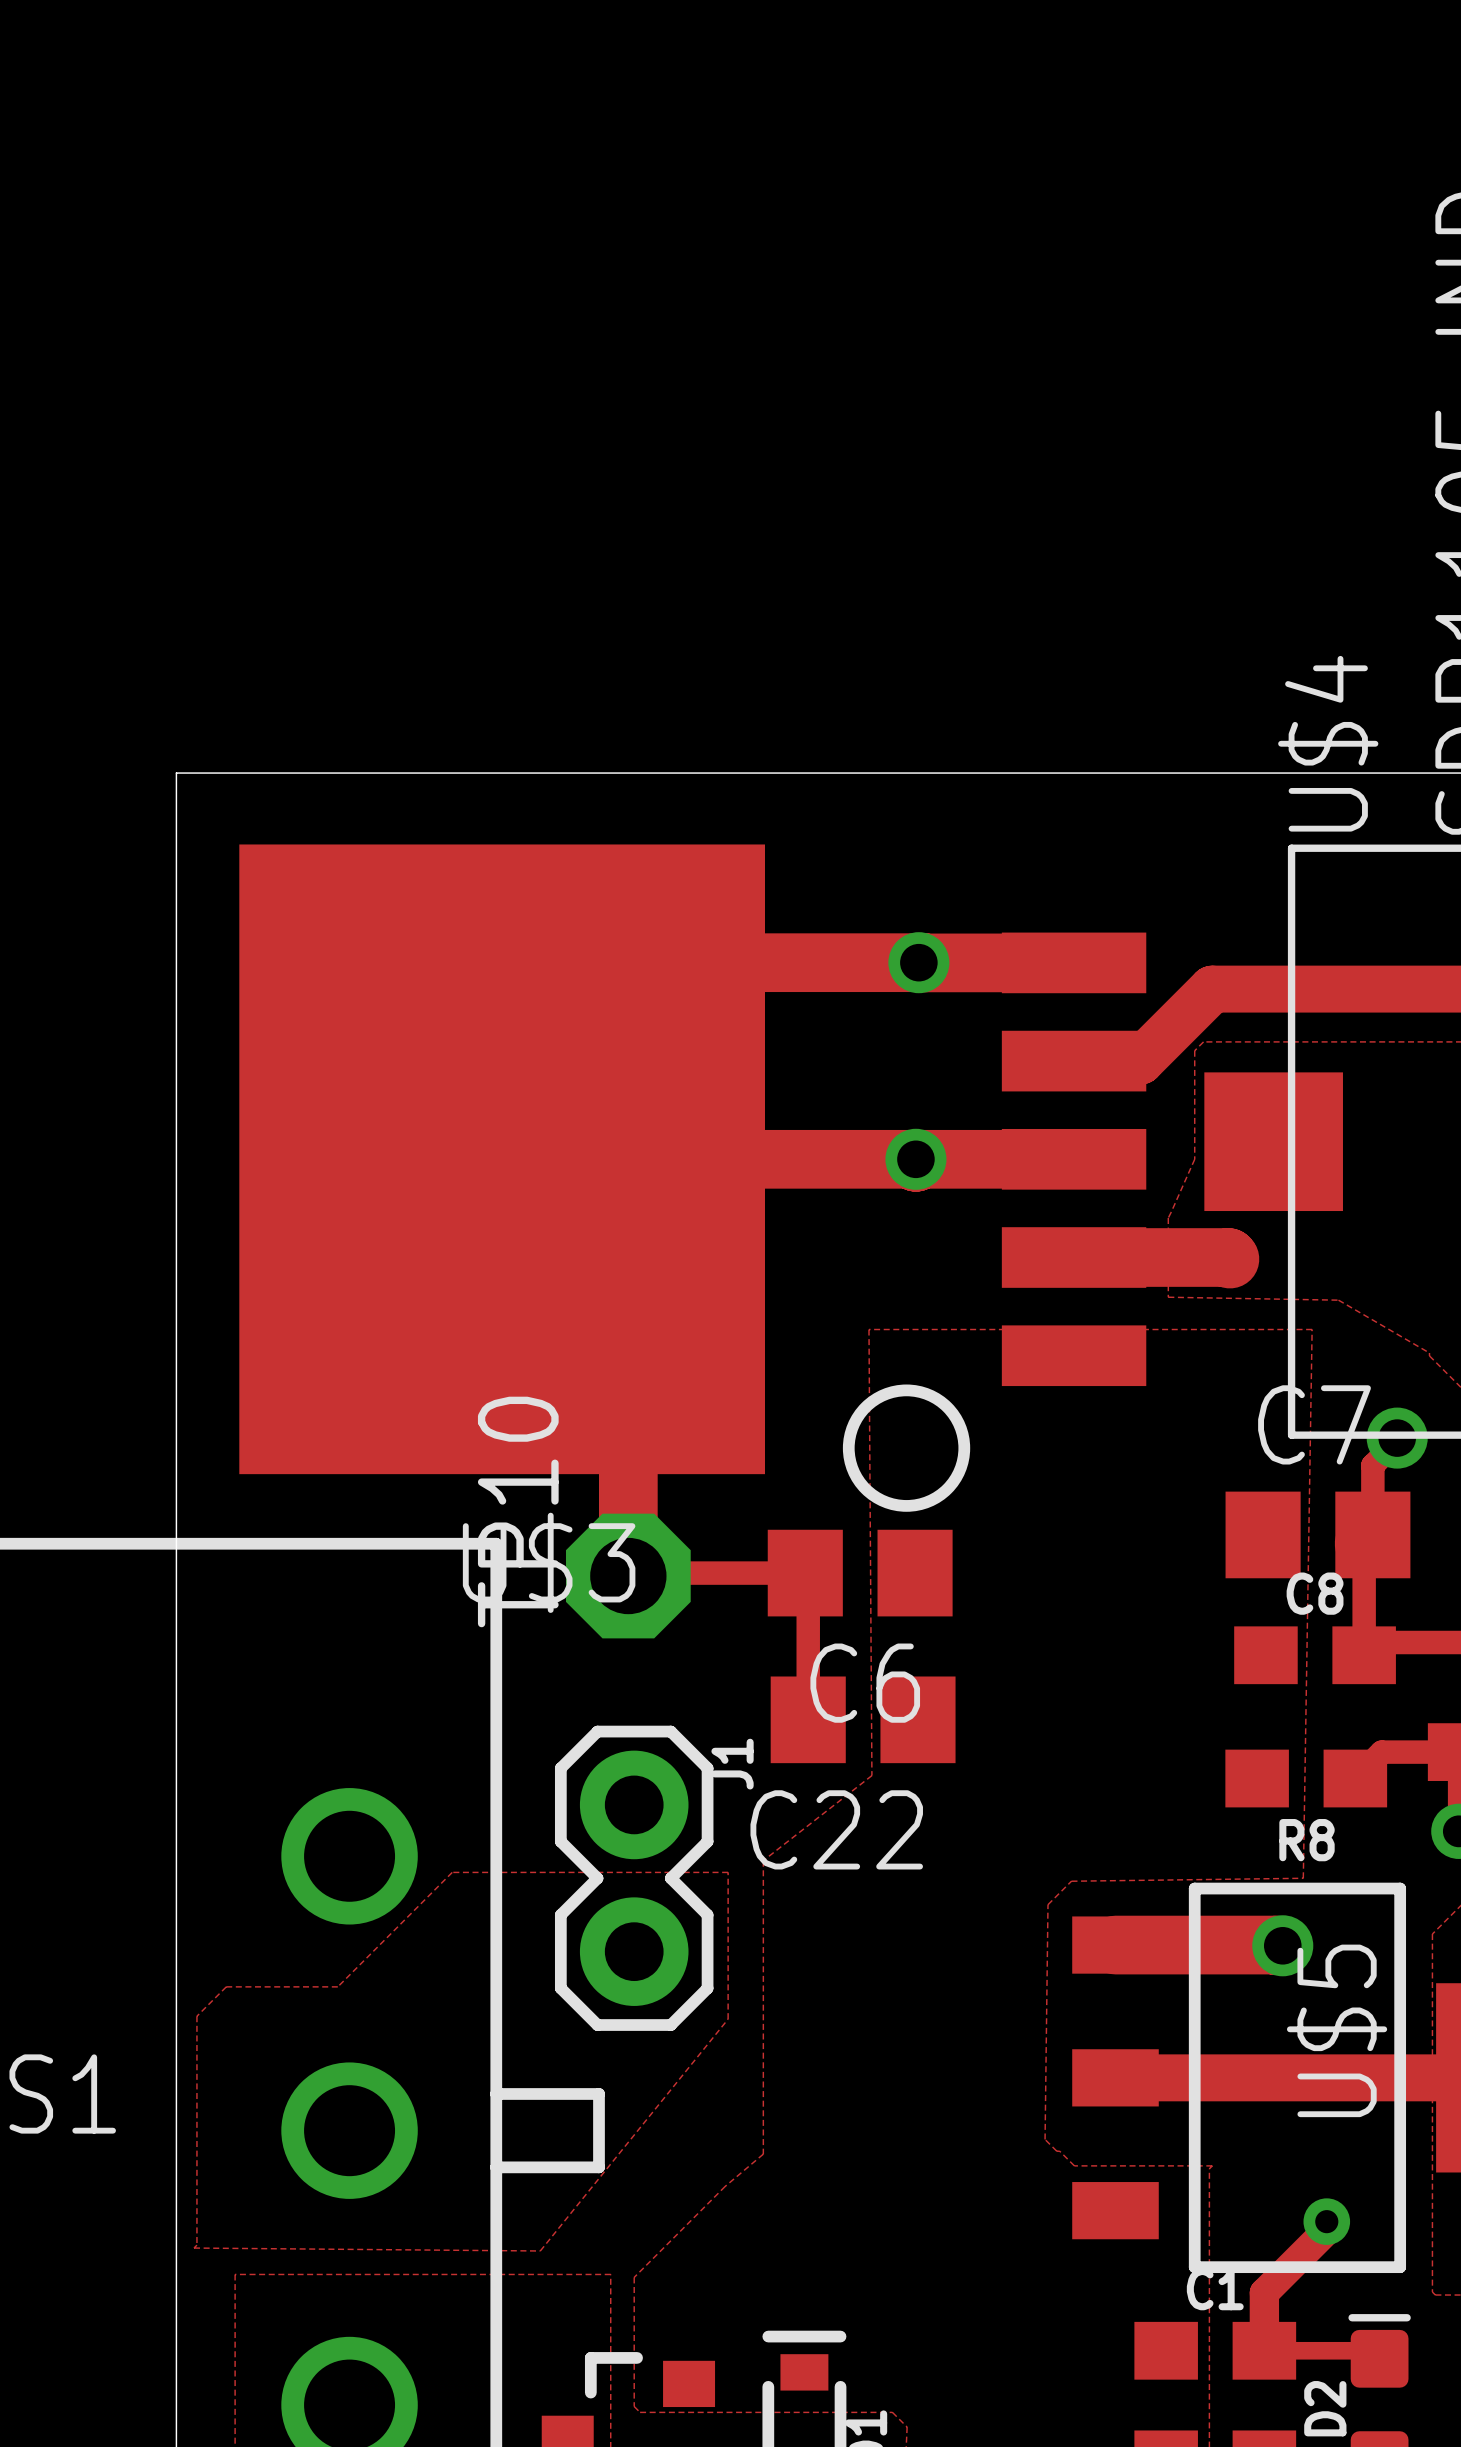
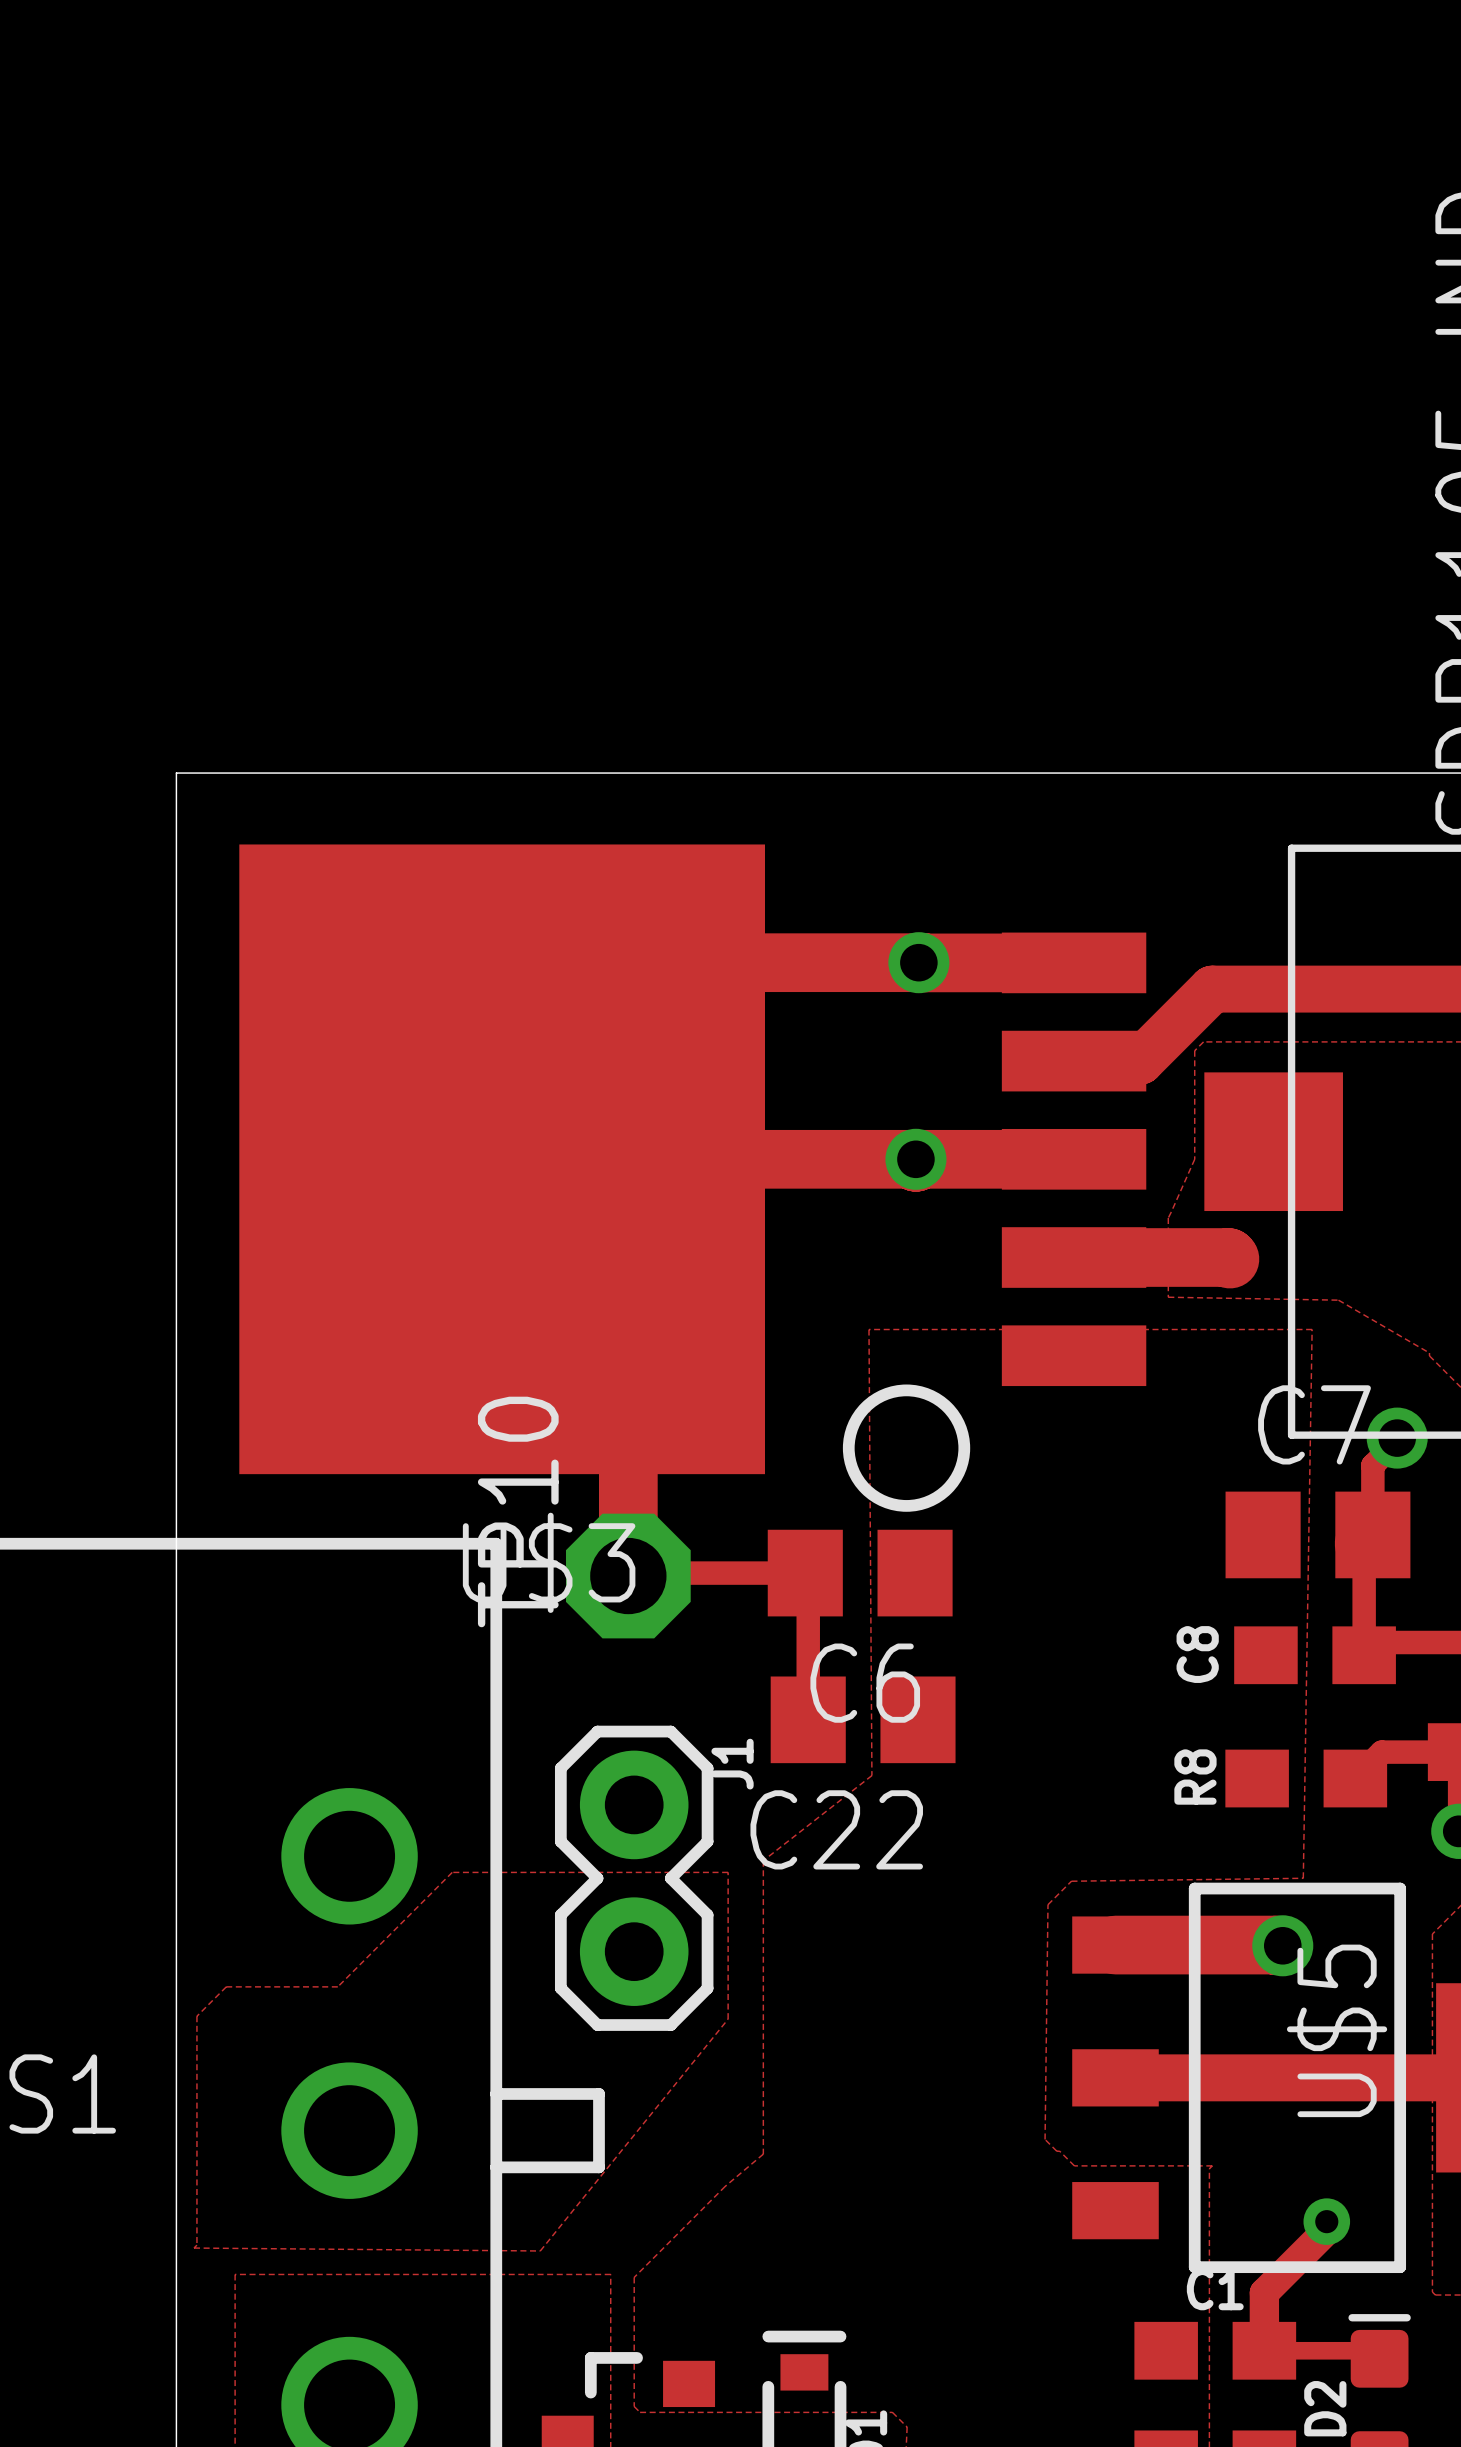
U$4 name: U$4 (1328, 743) -> none
C8 name rotation: 0° (1315, 1593) -> 90° counterclockwise (1197, 1654)
C8 name position: C8 (1315, 1593) -> C8 (1197, 1654)
R8 name rotation: 0° (1307, 1840) -> 90° counterclockwise (1195, 1777)
R8 name position: R8 (1307, 1840) -> R8 (1195, 1777)

